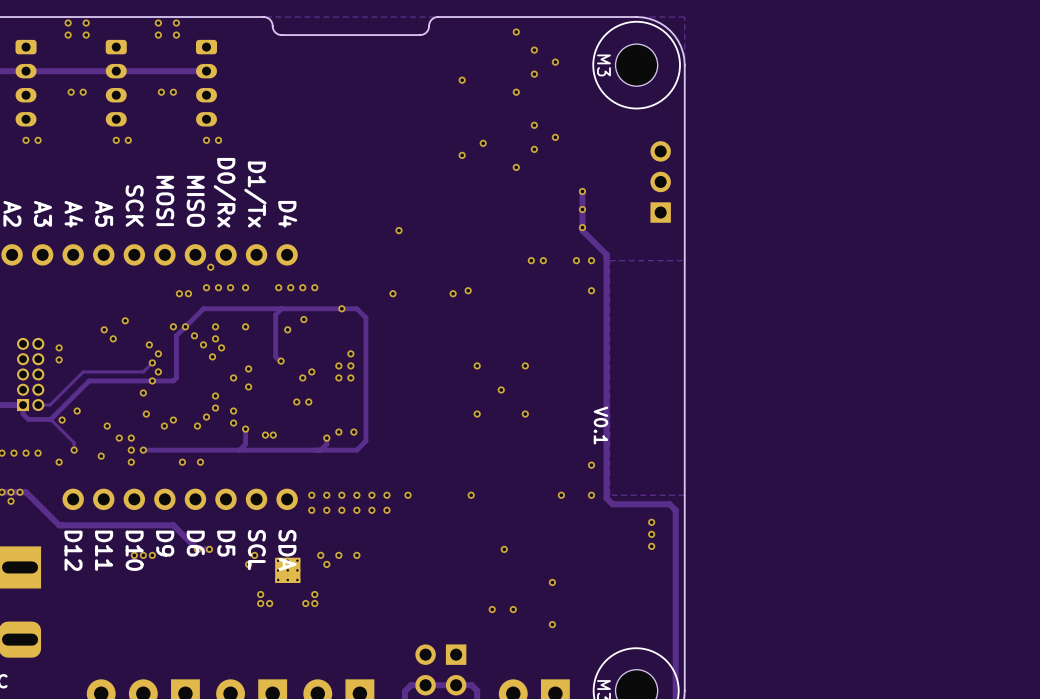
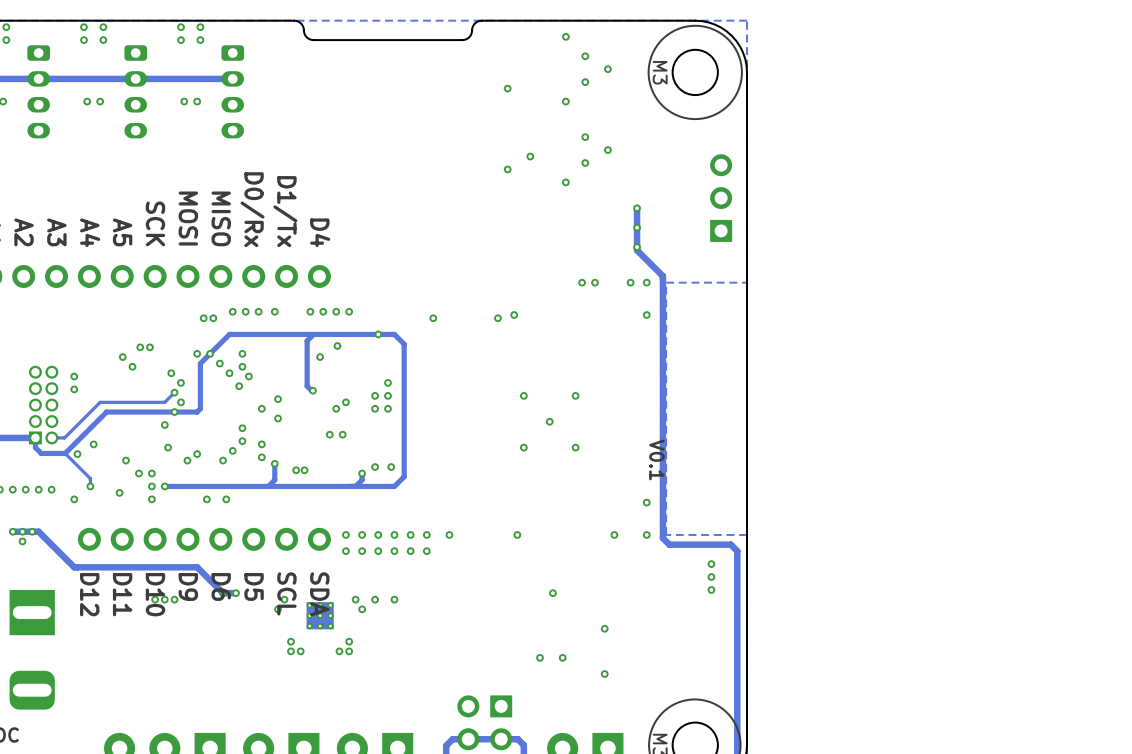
via: (26, 140) -> none
via: (38, 140) -> none
via: (116, 140) -> none
via: (128, 140) -> none
via: (206, 140) -> none
via: (218, 140) -> none
via: (399, 230) -> none
via: (210, 267) -> none
via: none -> (140, 347)
via: (125, 320) -> none
via: none -> (149, 347)
via: (245, 326) -> none

